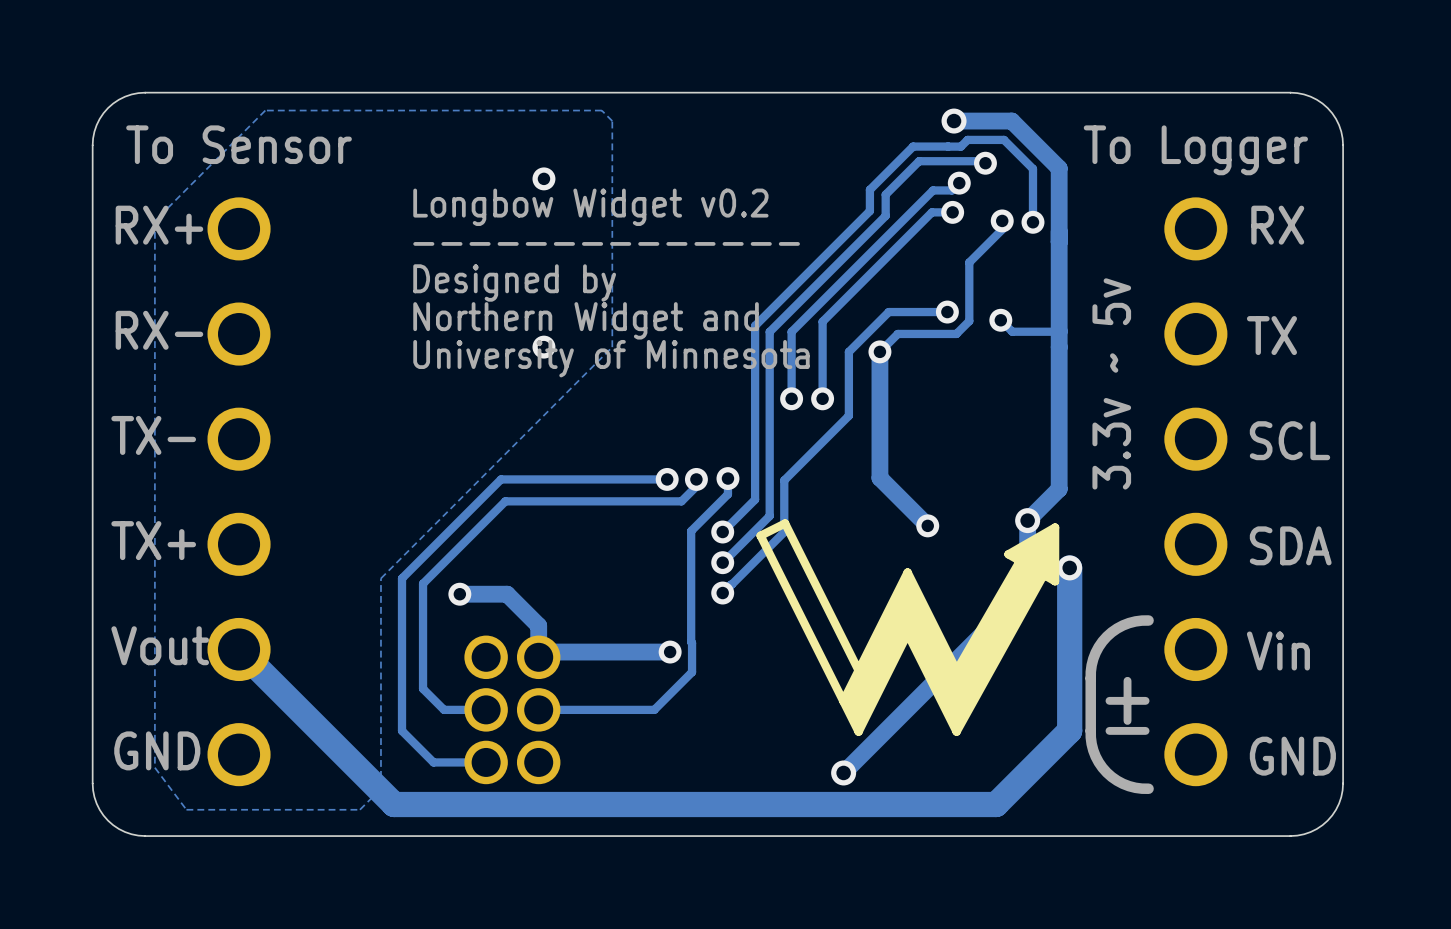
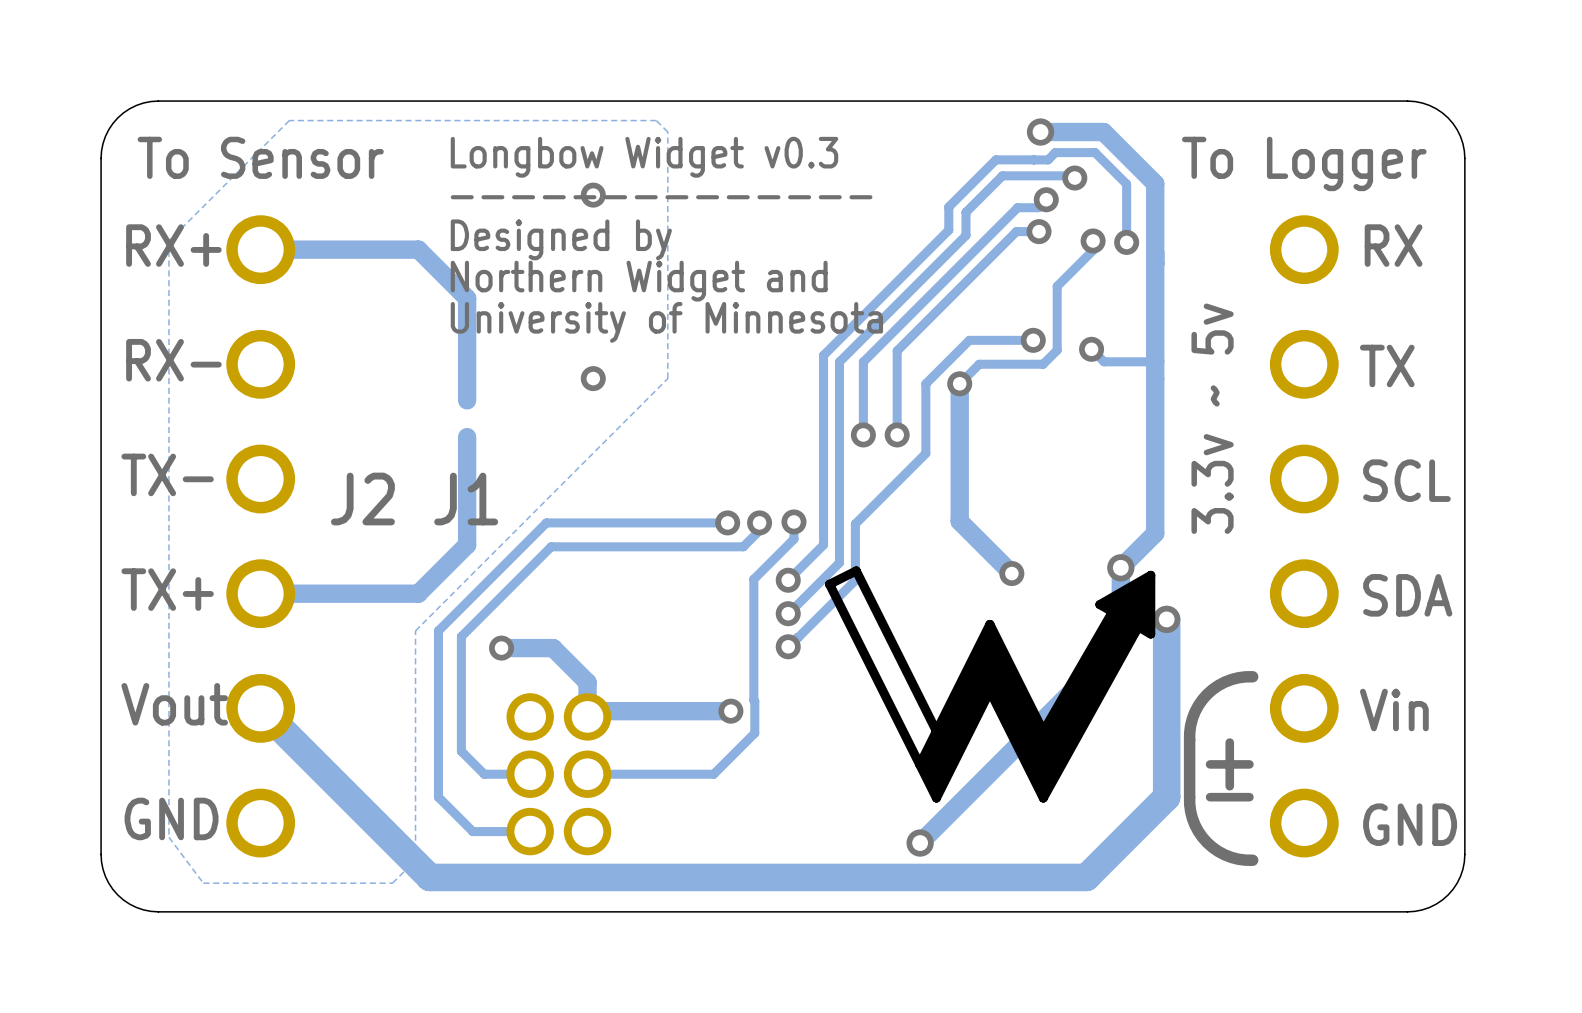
text: none -> Longbow Widget v0.3 (644, 157)
text: Longbow Widget v0.2 (590, 207) -> none
track: none -> (260, 249) (418, 249) (467, 298) (467, 400)
text position: -------------- (606, 243) -> -------------- (661, 197)
text position: Designed by (514, 282) -> Designed by (561, 239)
text position: Northern Widget and (586, 320) -> Northern Widget and (639, 281)
text position: University of Minnesota (611, 358) -> University of Minnesota (666, 322)
track: none -> (467, 437) (467, 544) (418, 593) (260, 593)
text: none -> J2 (362, 499)
text: none -> J1 (466, 499)

